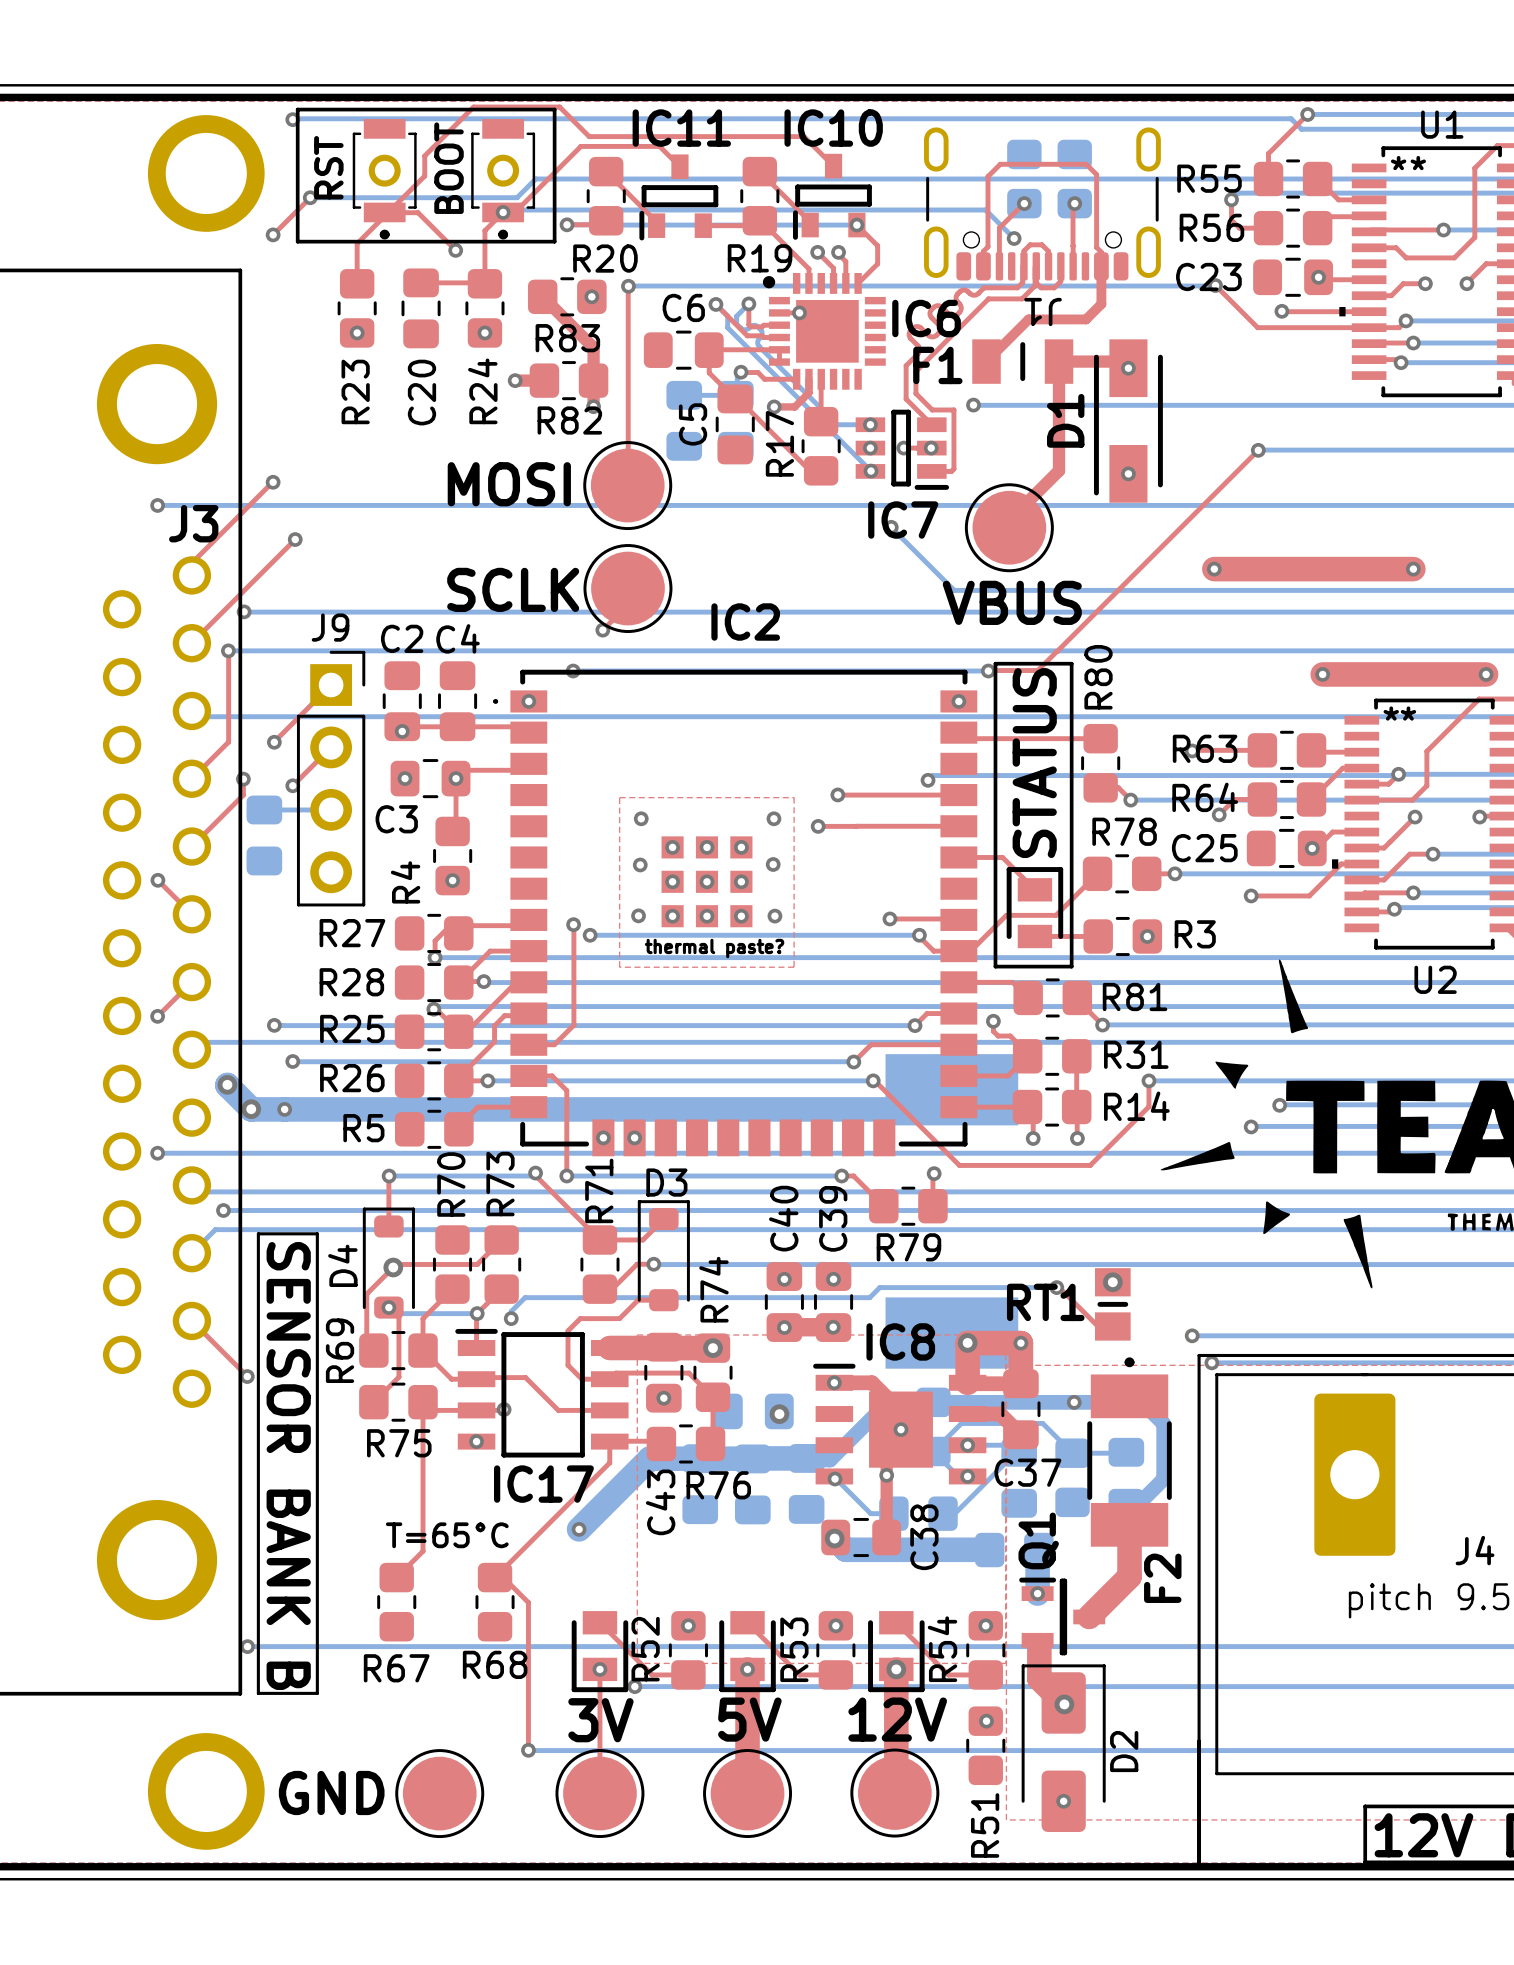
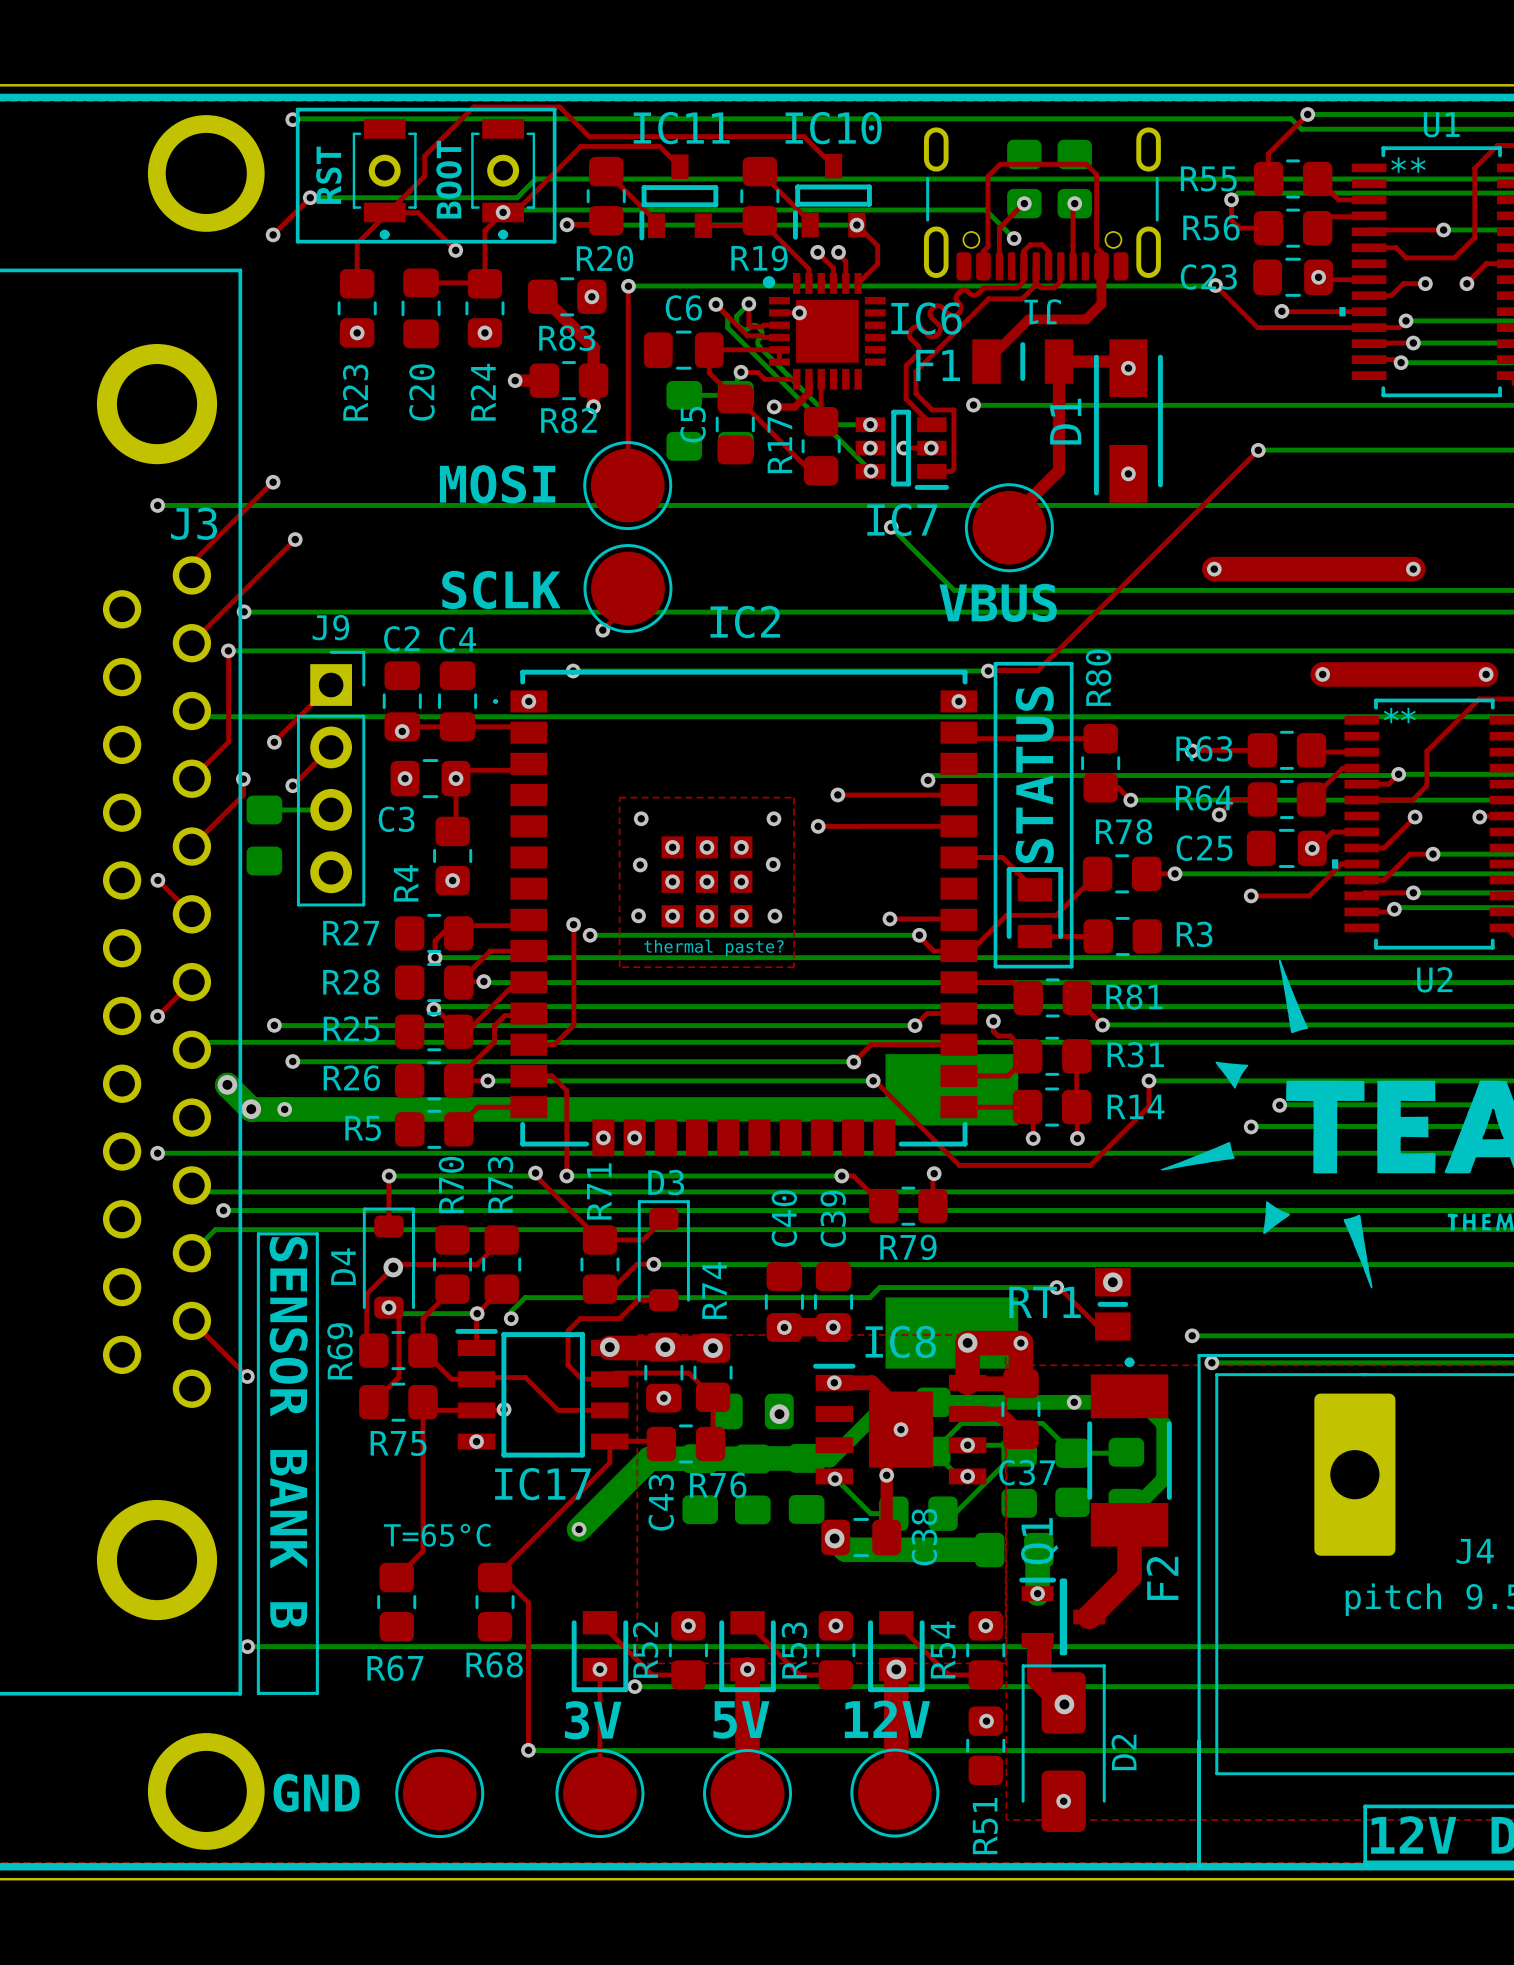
via: (1147, 936) -> none
via: (784, 1279) -> none
via: (833, 1279) -> none
via: none -> (609, 1347)
via: none -> (665, 1347)

